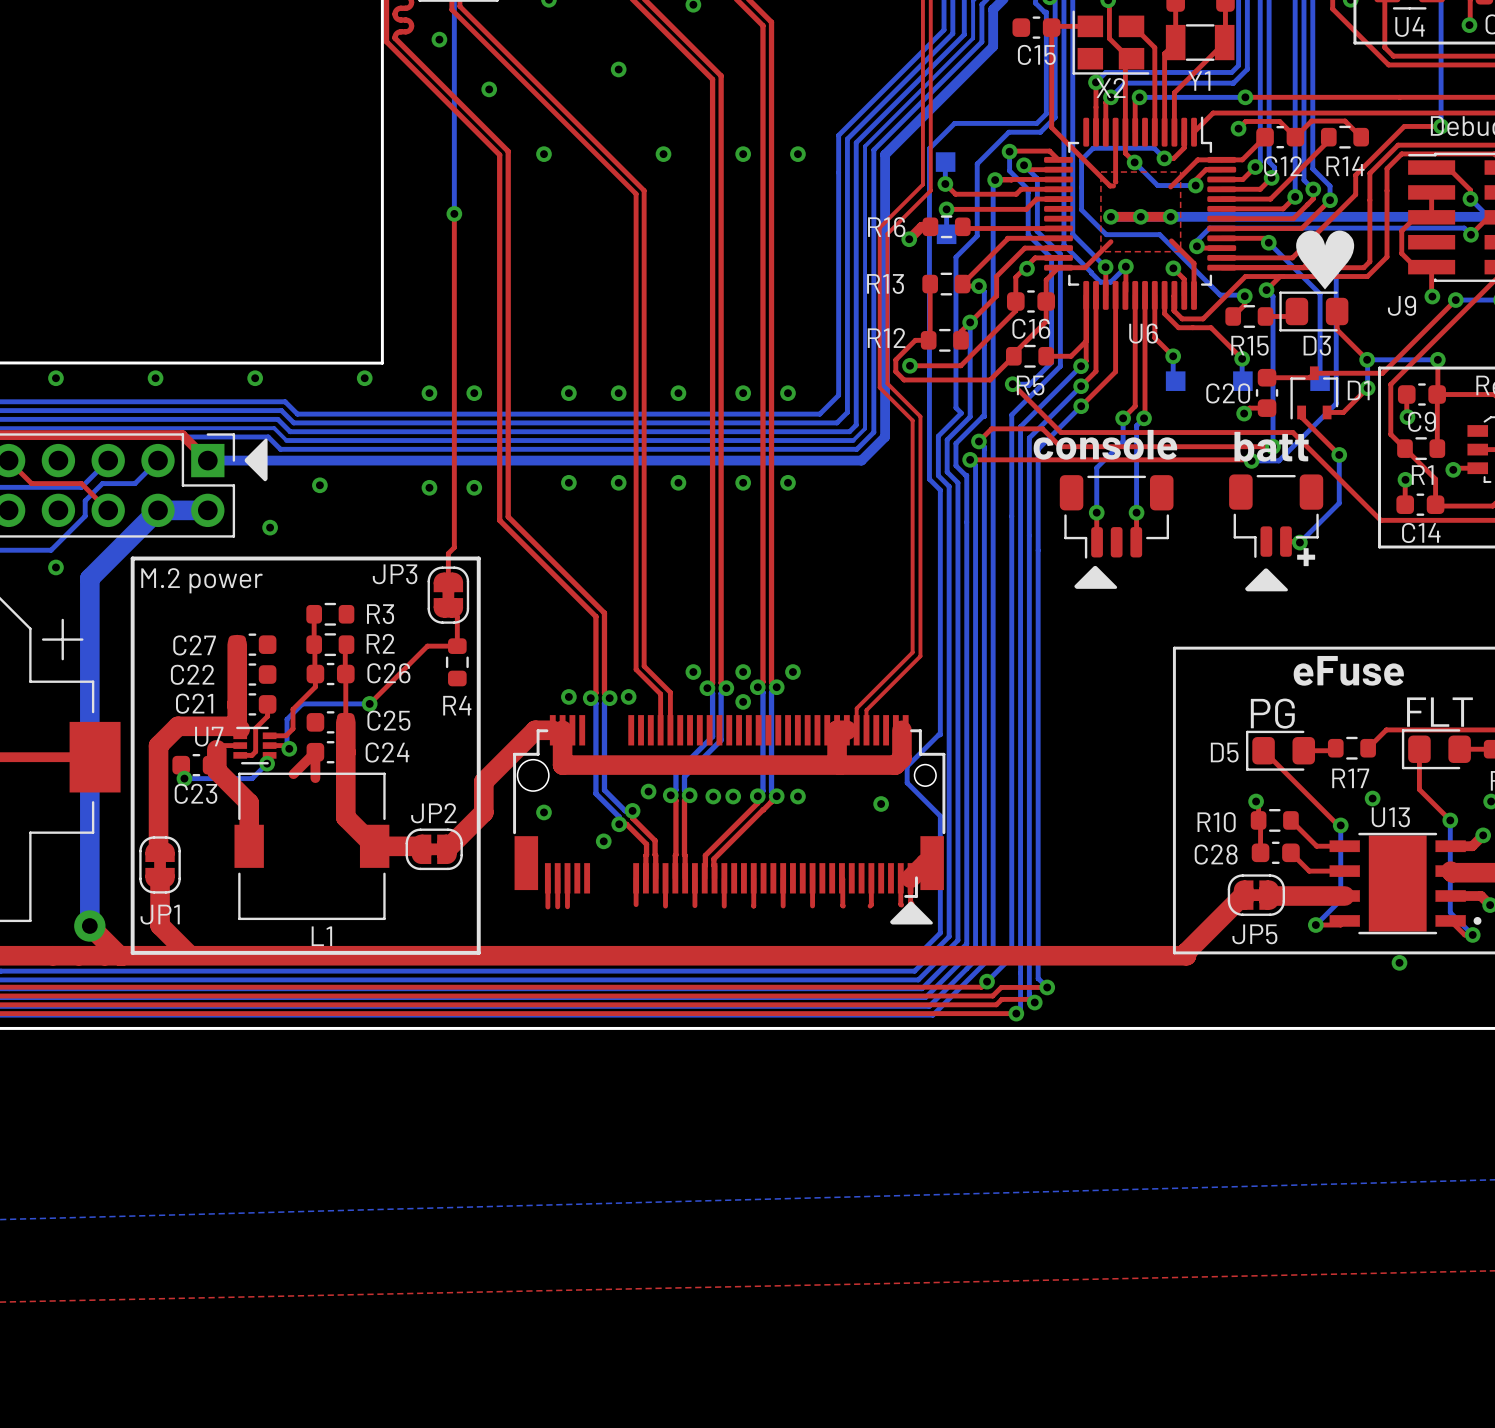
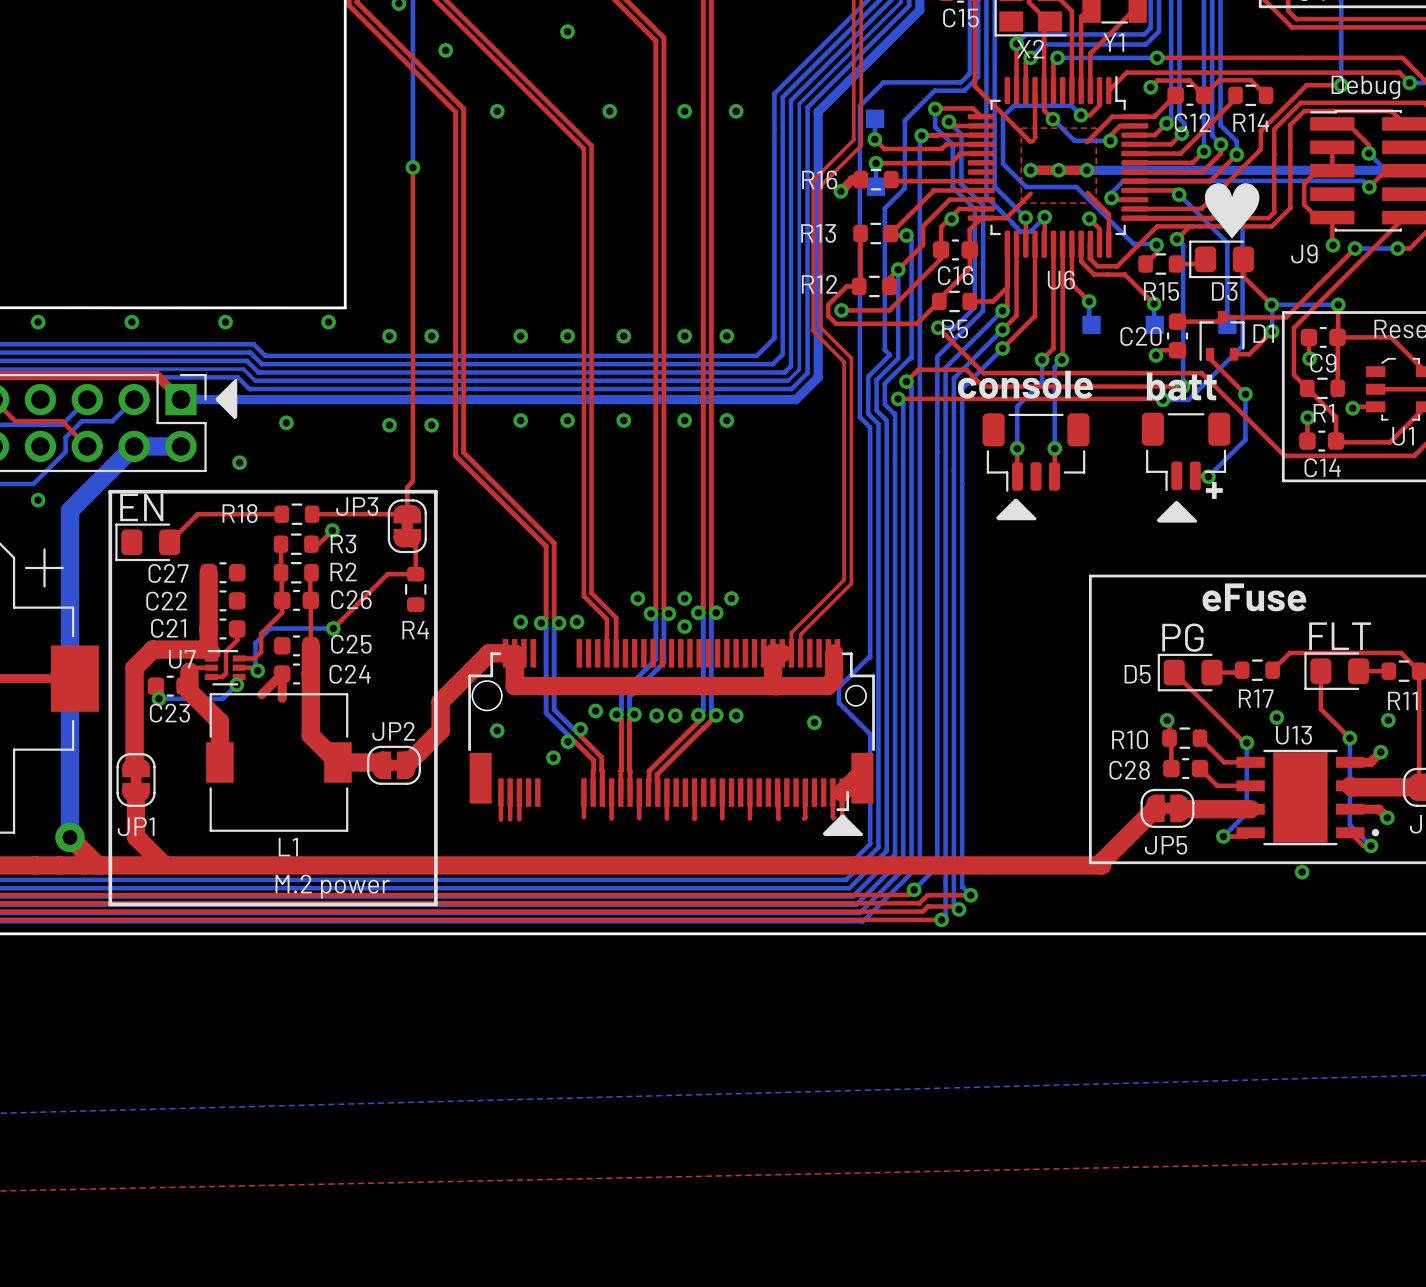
text: M.2 power (201, 580) -> EN (141, 507)
top track: none -> (281, 514) (197, 514) (169, 542)
R18: none -> (296, 514)
top track: none -> (312, 514) (407, 514)
top track: none -> (332, 530) (318, 544) (311, 544)
via: none -> (332, 530)
part: none -> (147, 542)
line: (132, 952) (478, 952) -> (110, 862) (110, 904) (435, 904) (435, 862)
text: none -> M.2 power (332, 886)

